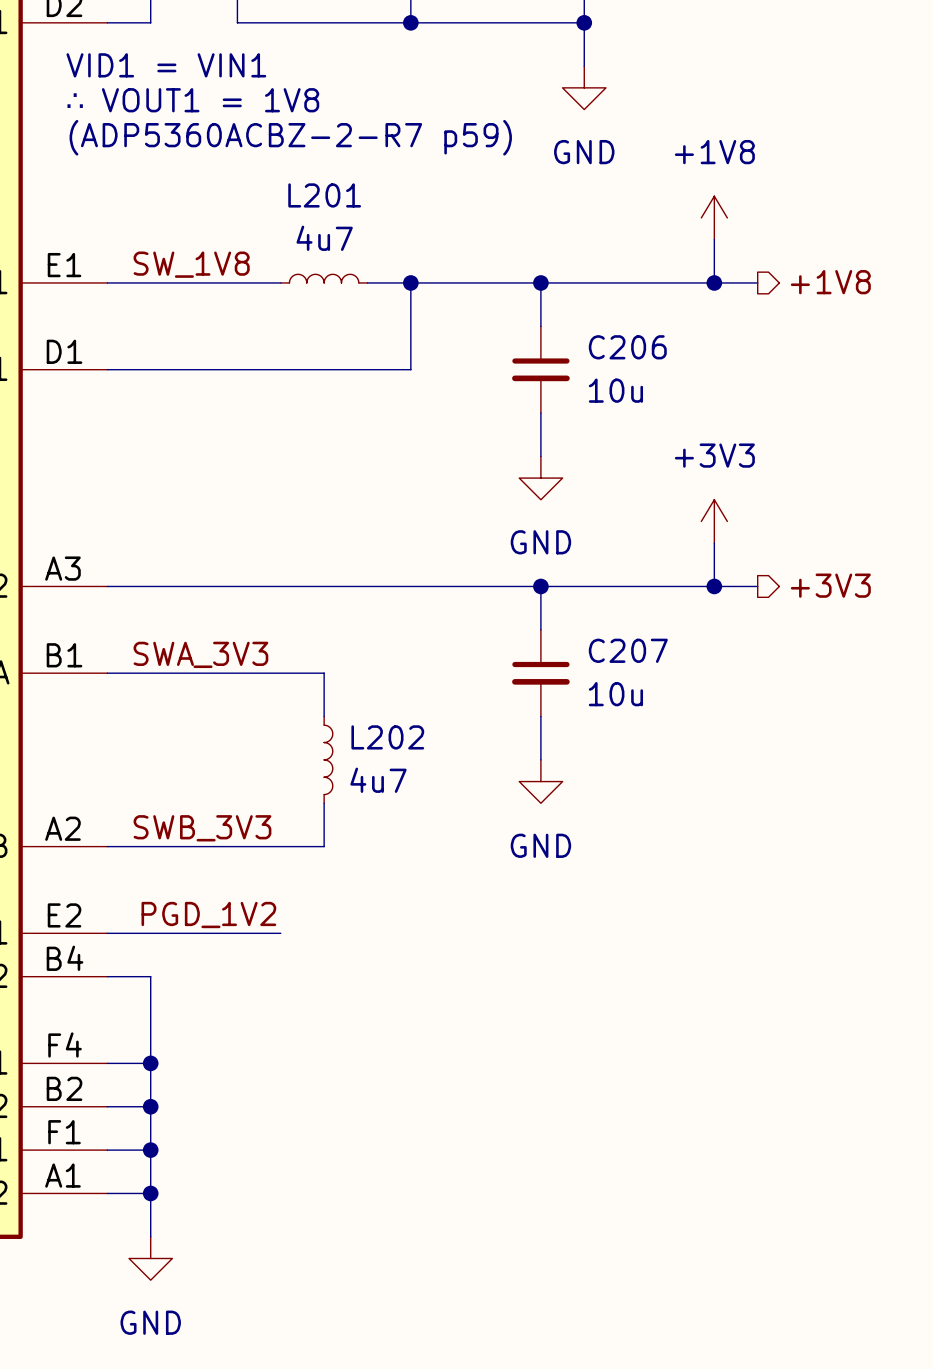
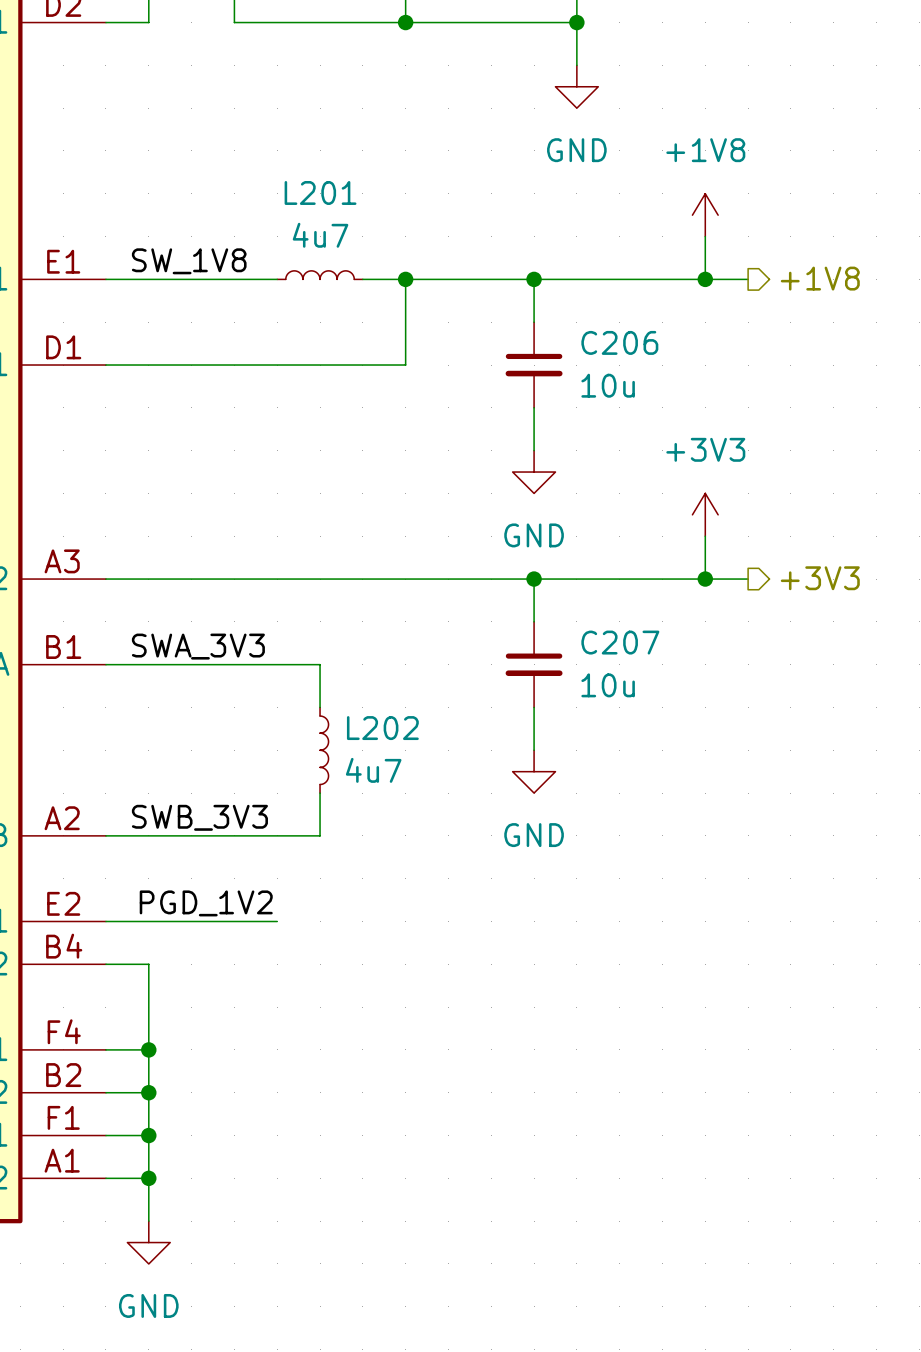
text: VID1 = VIN1 (166, 65) -> none
text: ∴ VOUT1 = 1V8 (192, 100) -> none
text: (ADP5360ACBZ-2-R7 p59) (290, 137) -> none

